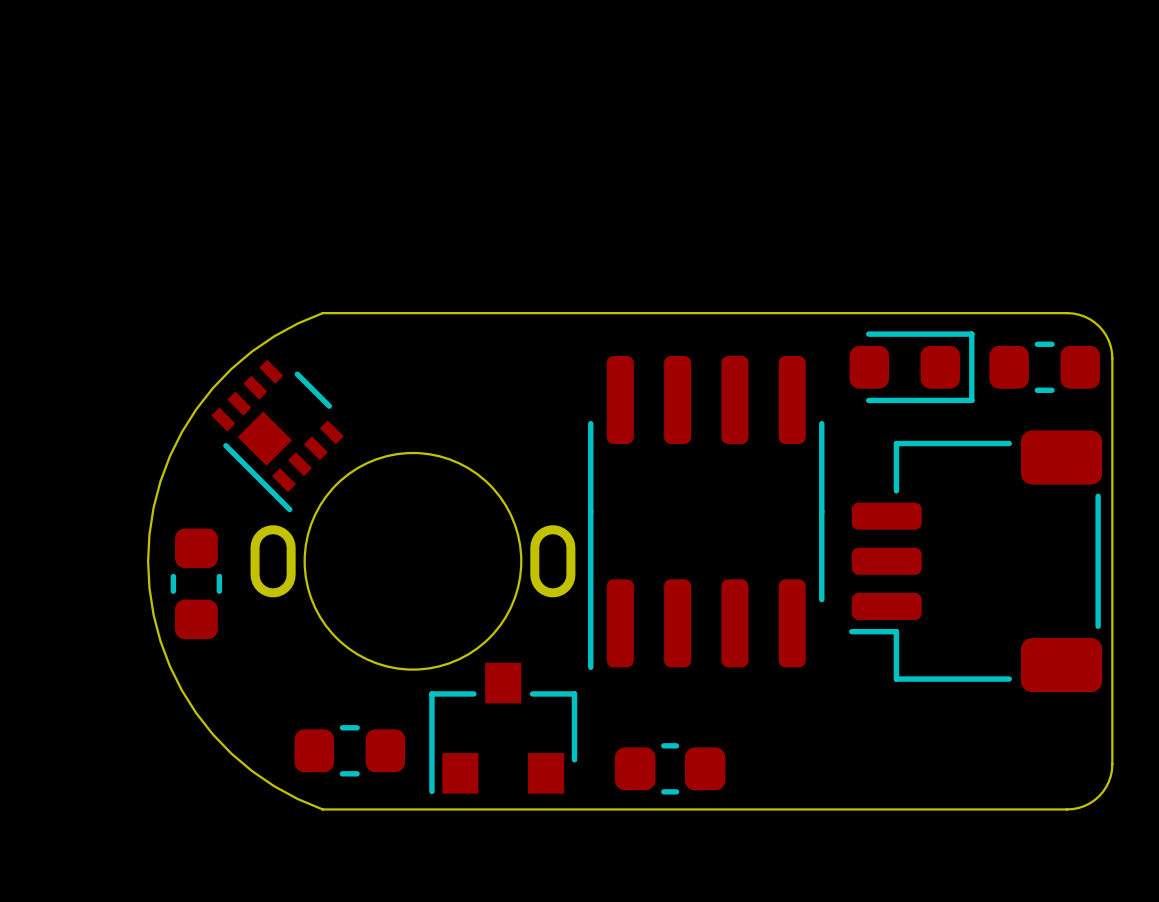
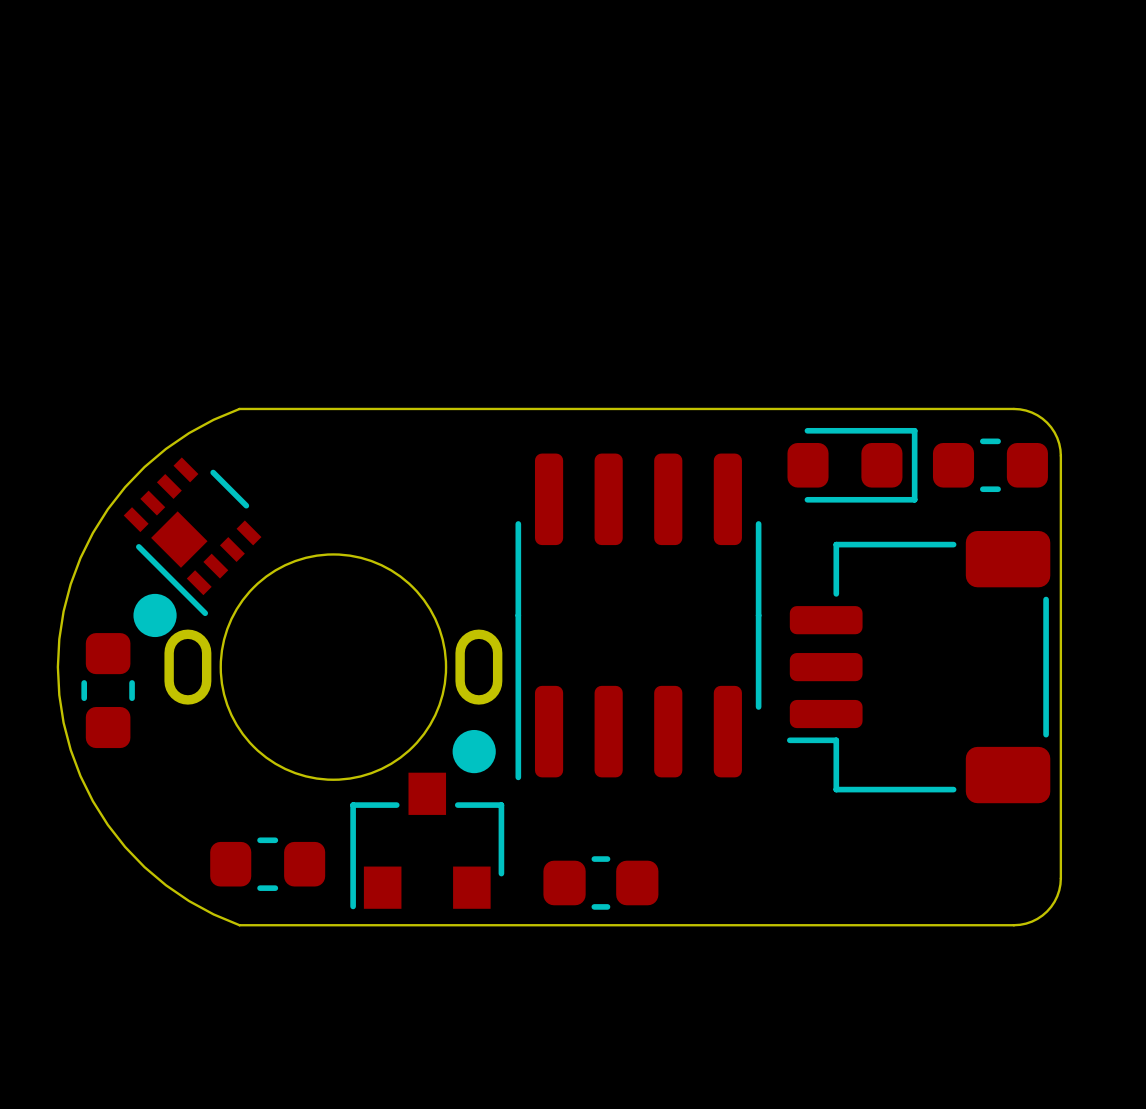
drawing: none -> [133, 593, 177, 638]
drawing: none -> [452, 729, 496, 774]

